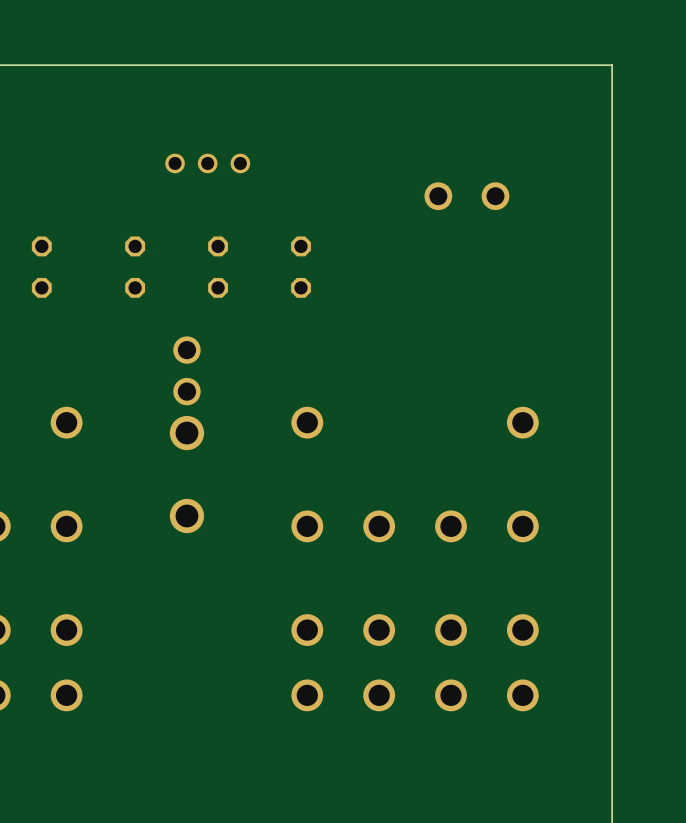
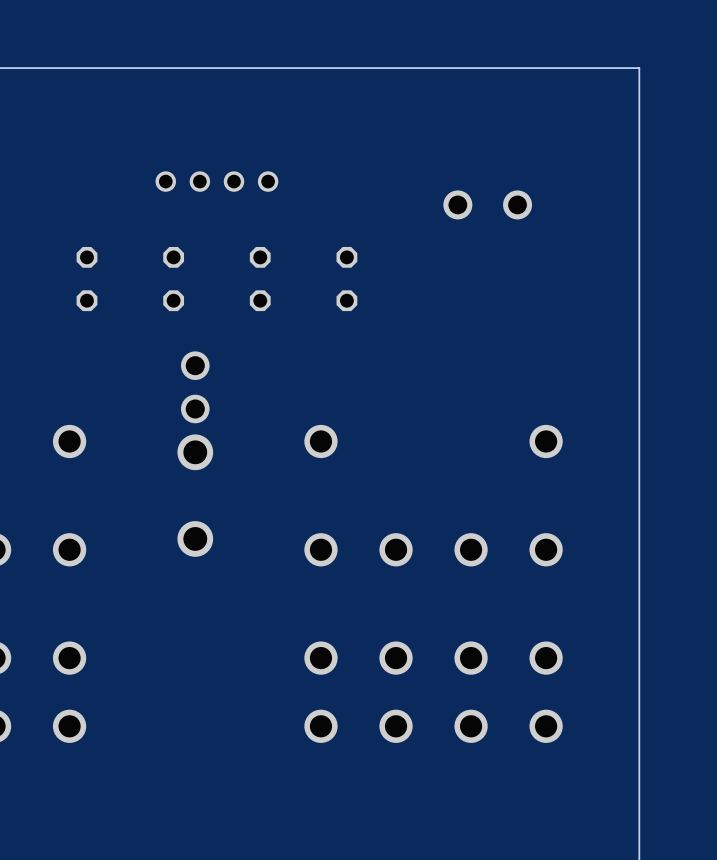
part footprint: [165, 153, 251, 174] -> [155, 171, 279, 192]
part: (41, 267) -> none
part: none -> (86, 279)
part: (135, 267) -> none
part: none -> (173, 279)
part: (218, 267) -> none
part: none -> (260, 279)
part: (301, 267) -> none
part: none -> (346, 279)

